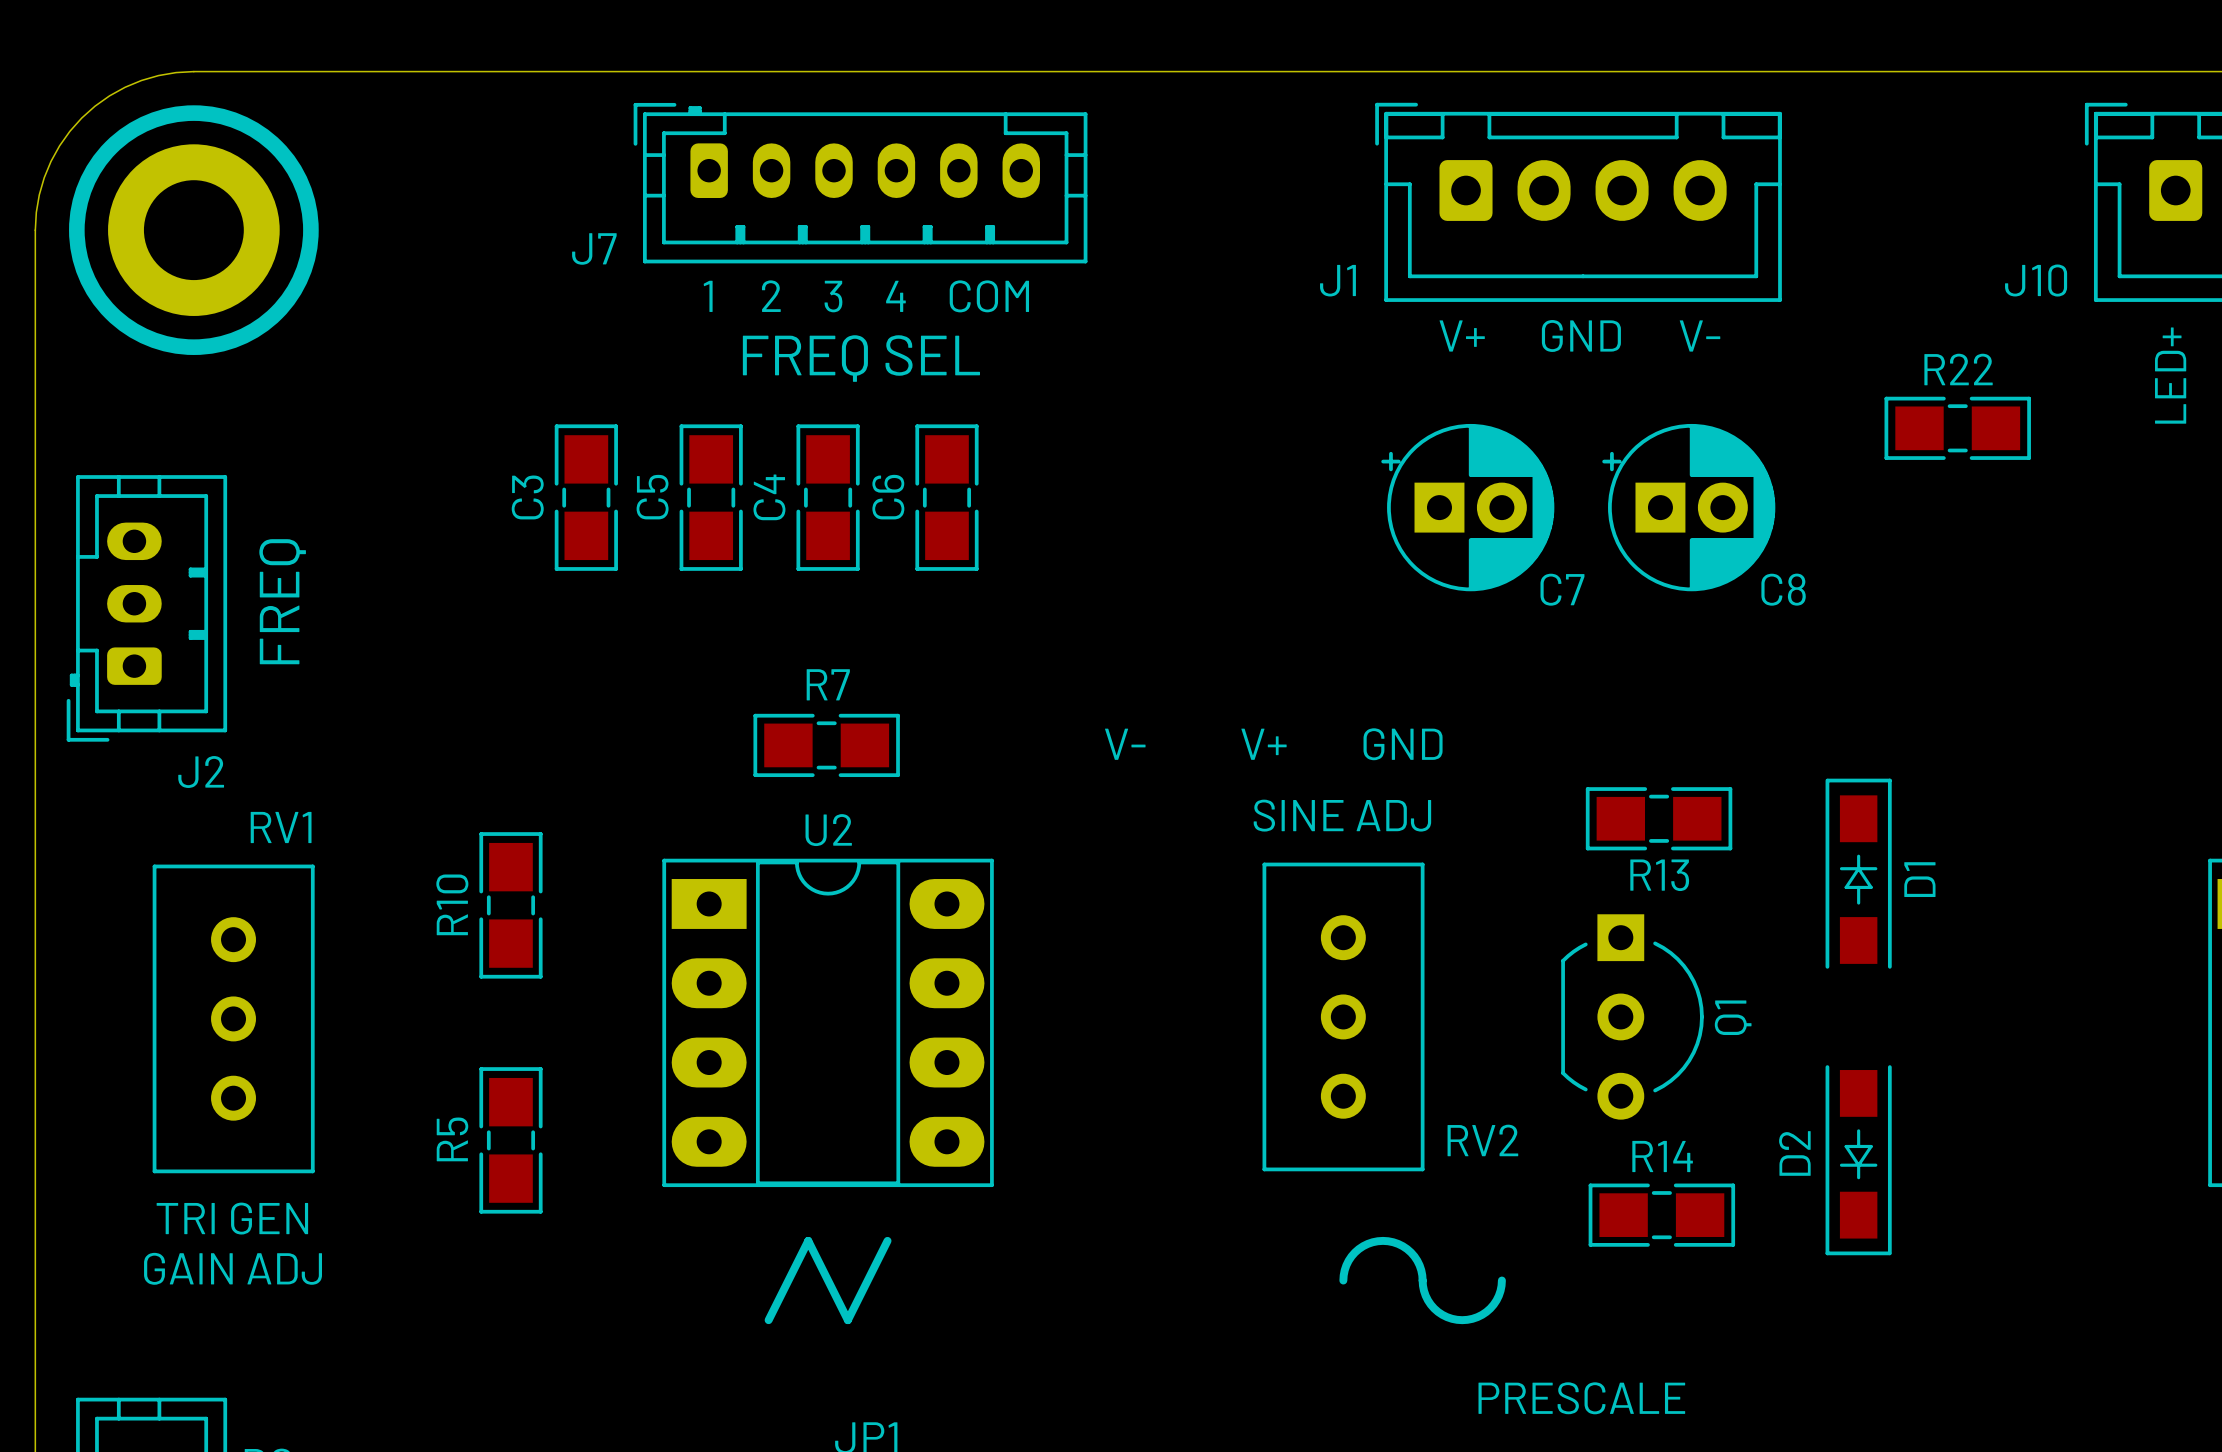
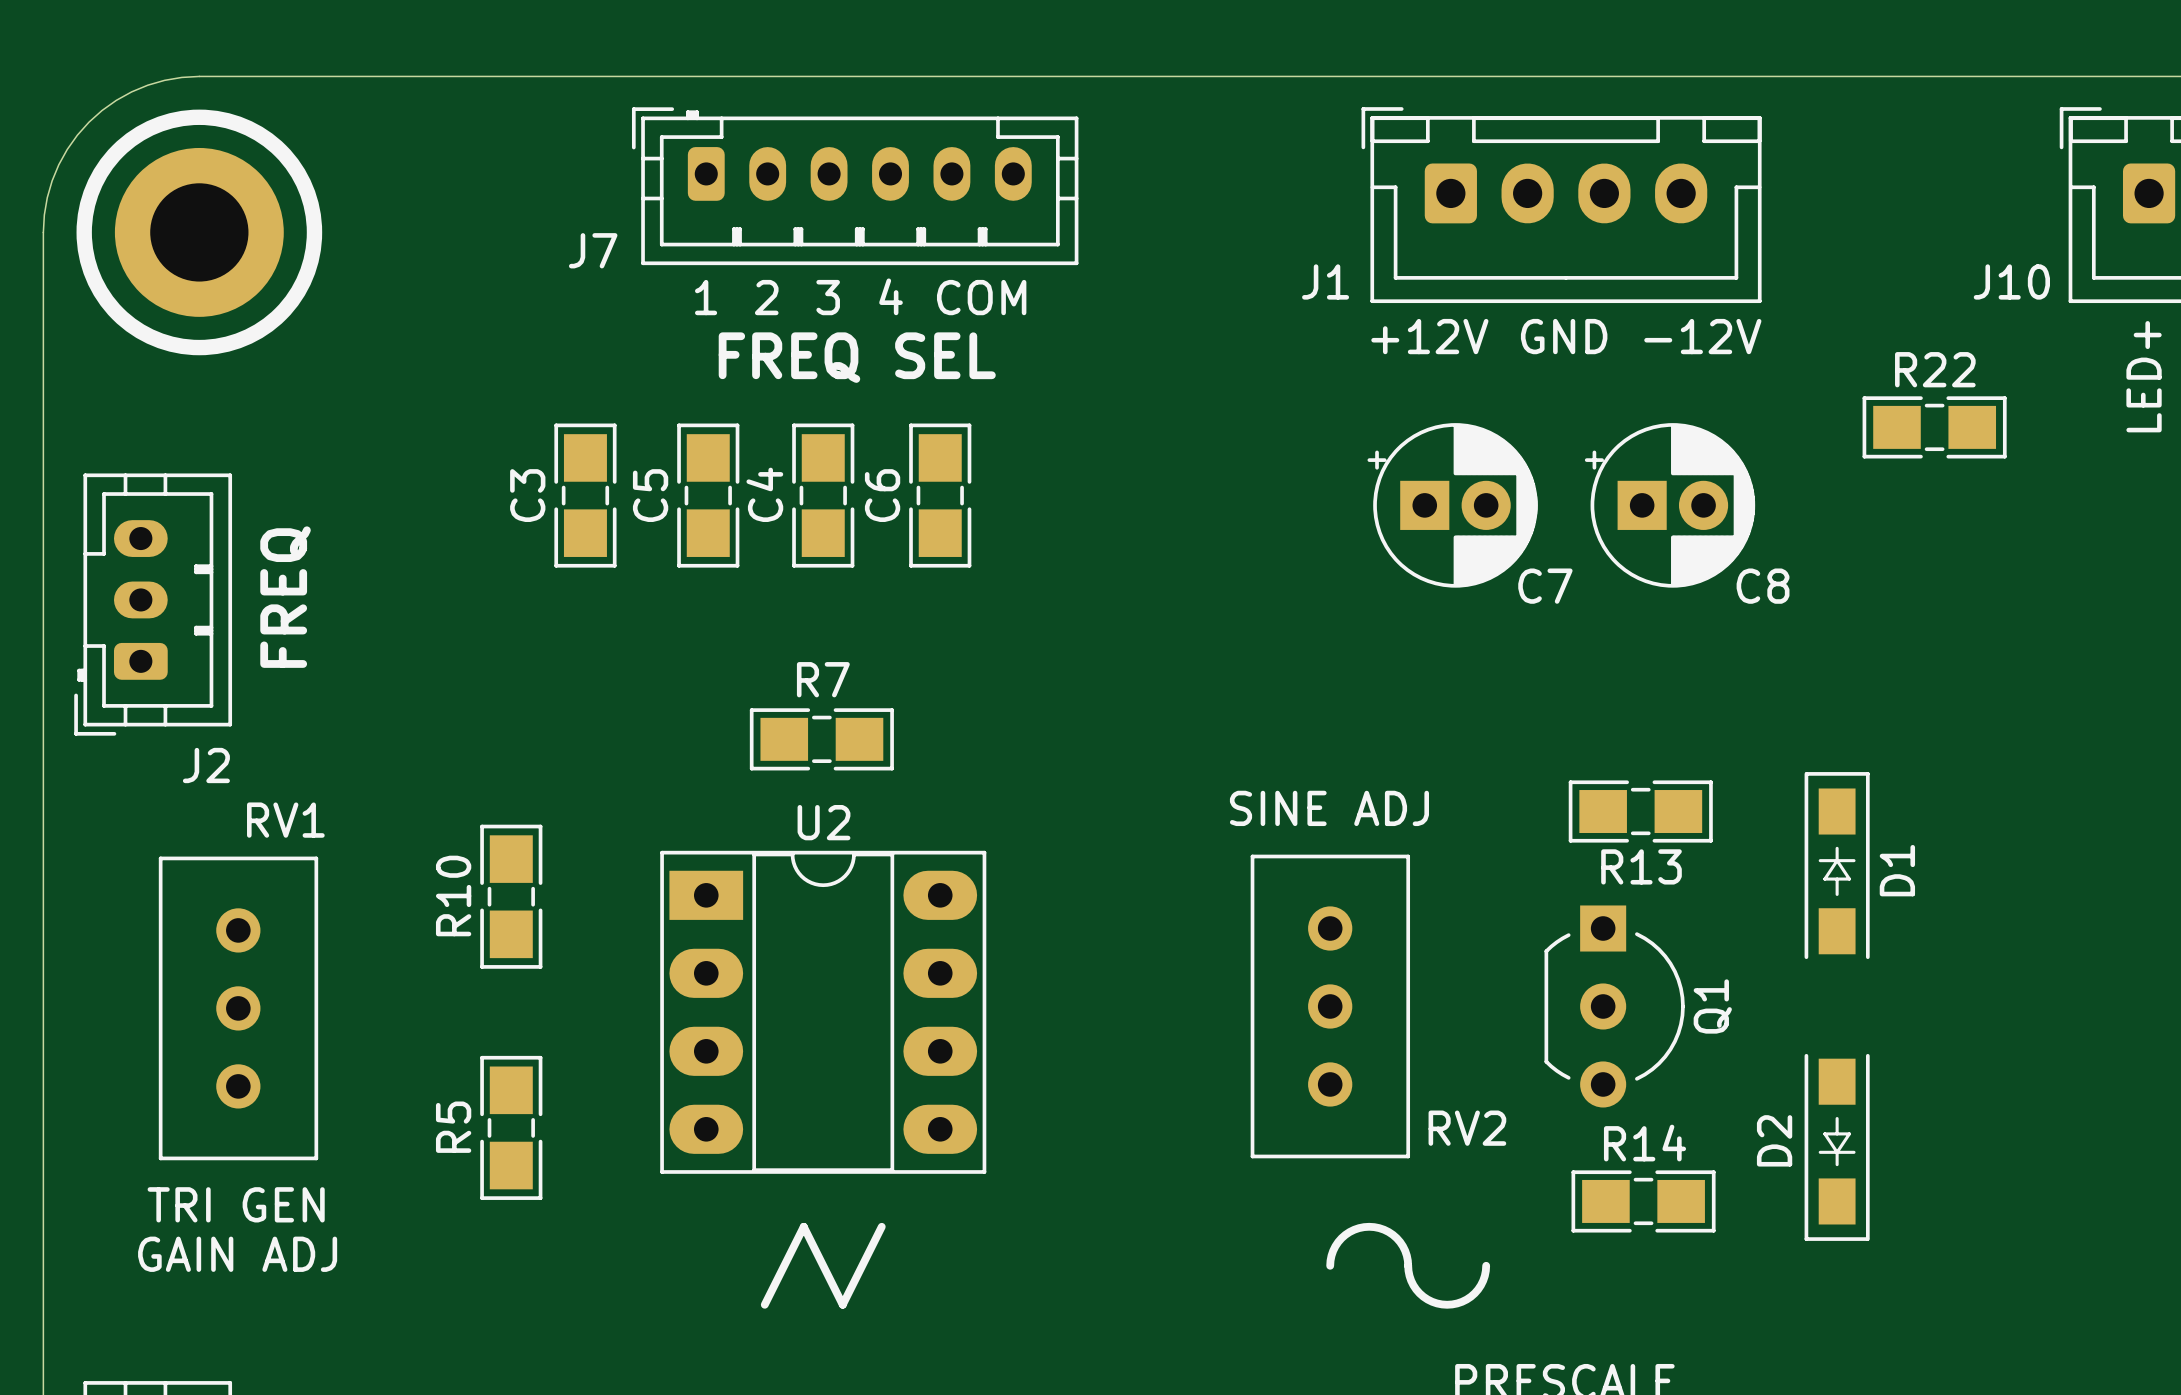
text: V+ (1462, 335) -> +12V (1429, 336)
text: V- (1700, 335) -> -12V (1702, 336)
text: V- (1125, 744) -> none
text: V+ (1263, 744) -> none
text: GND (1403, 744) -> none

